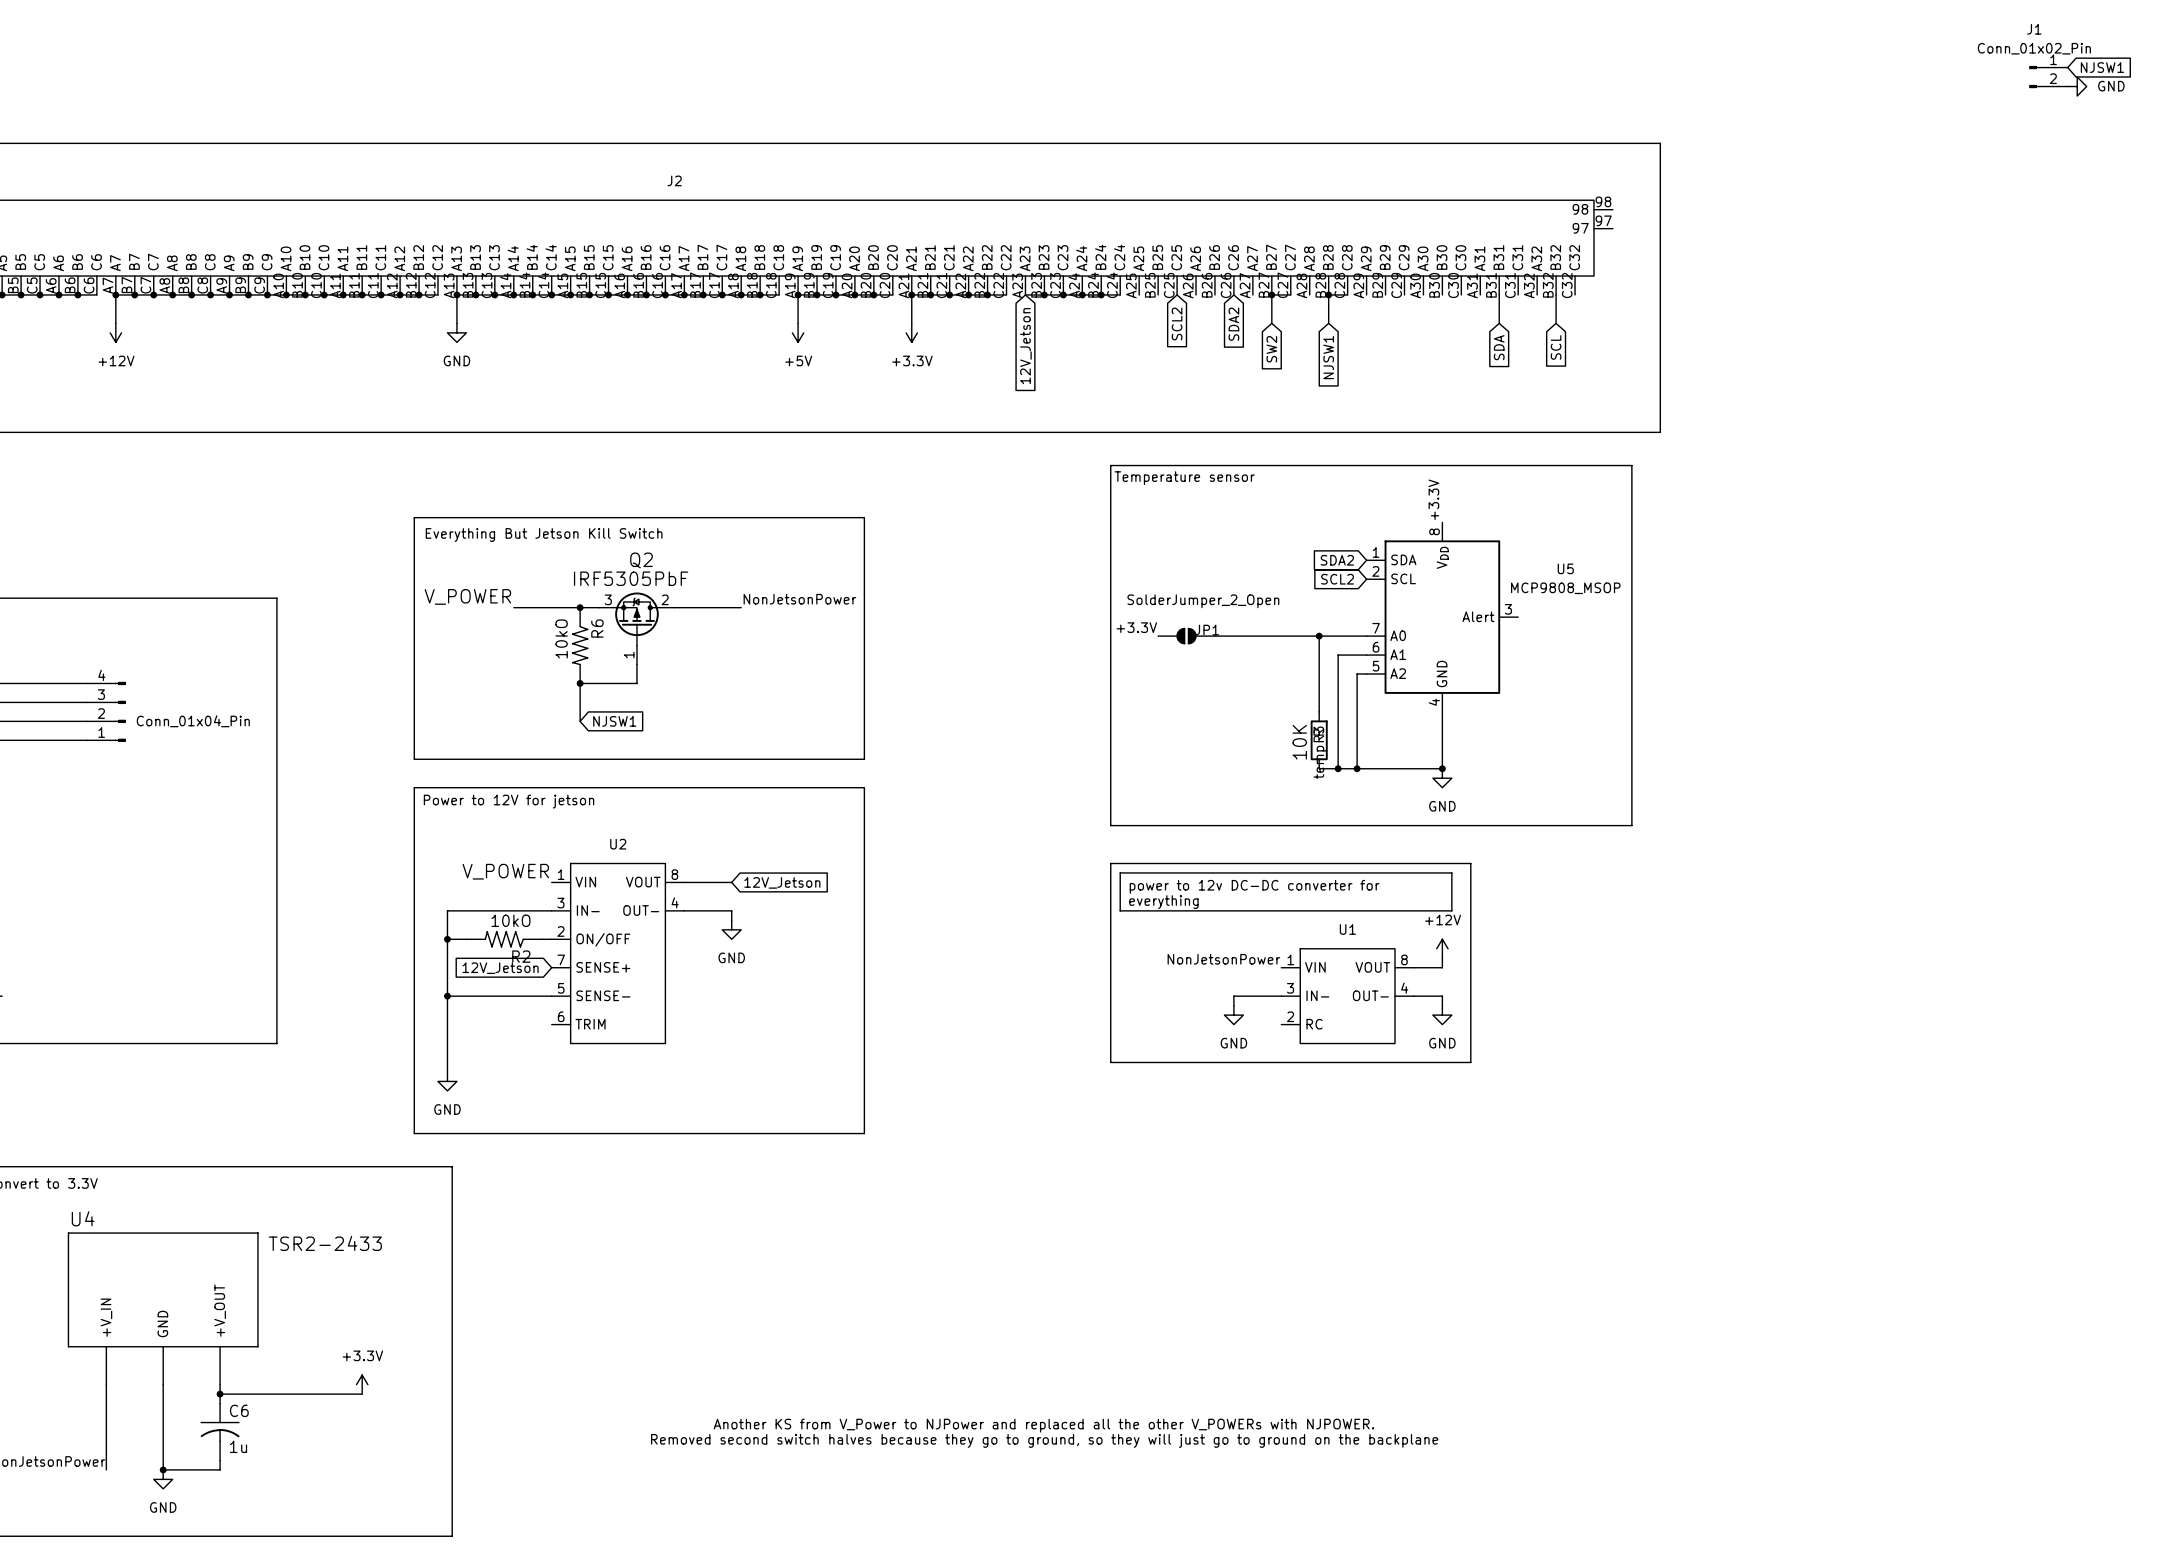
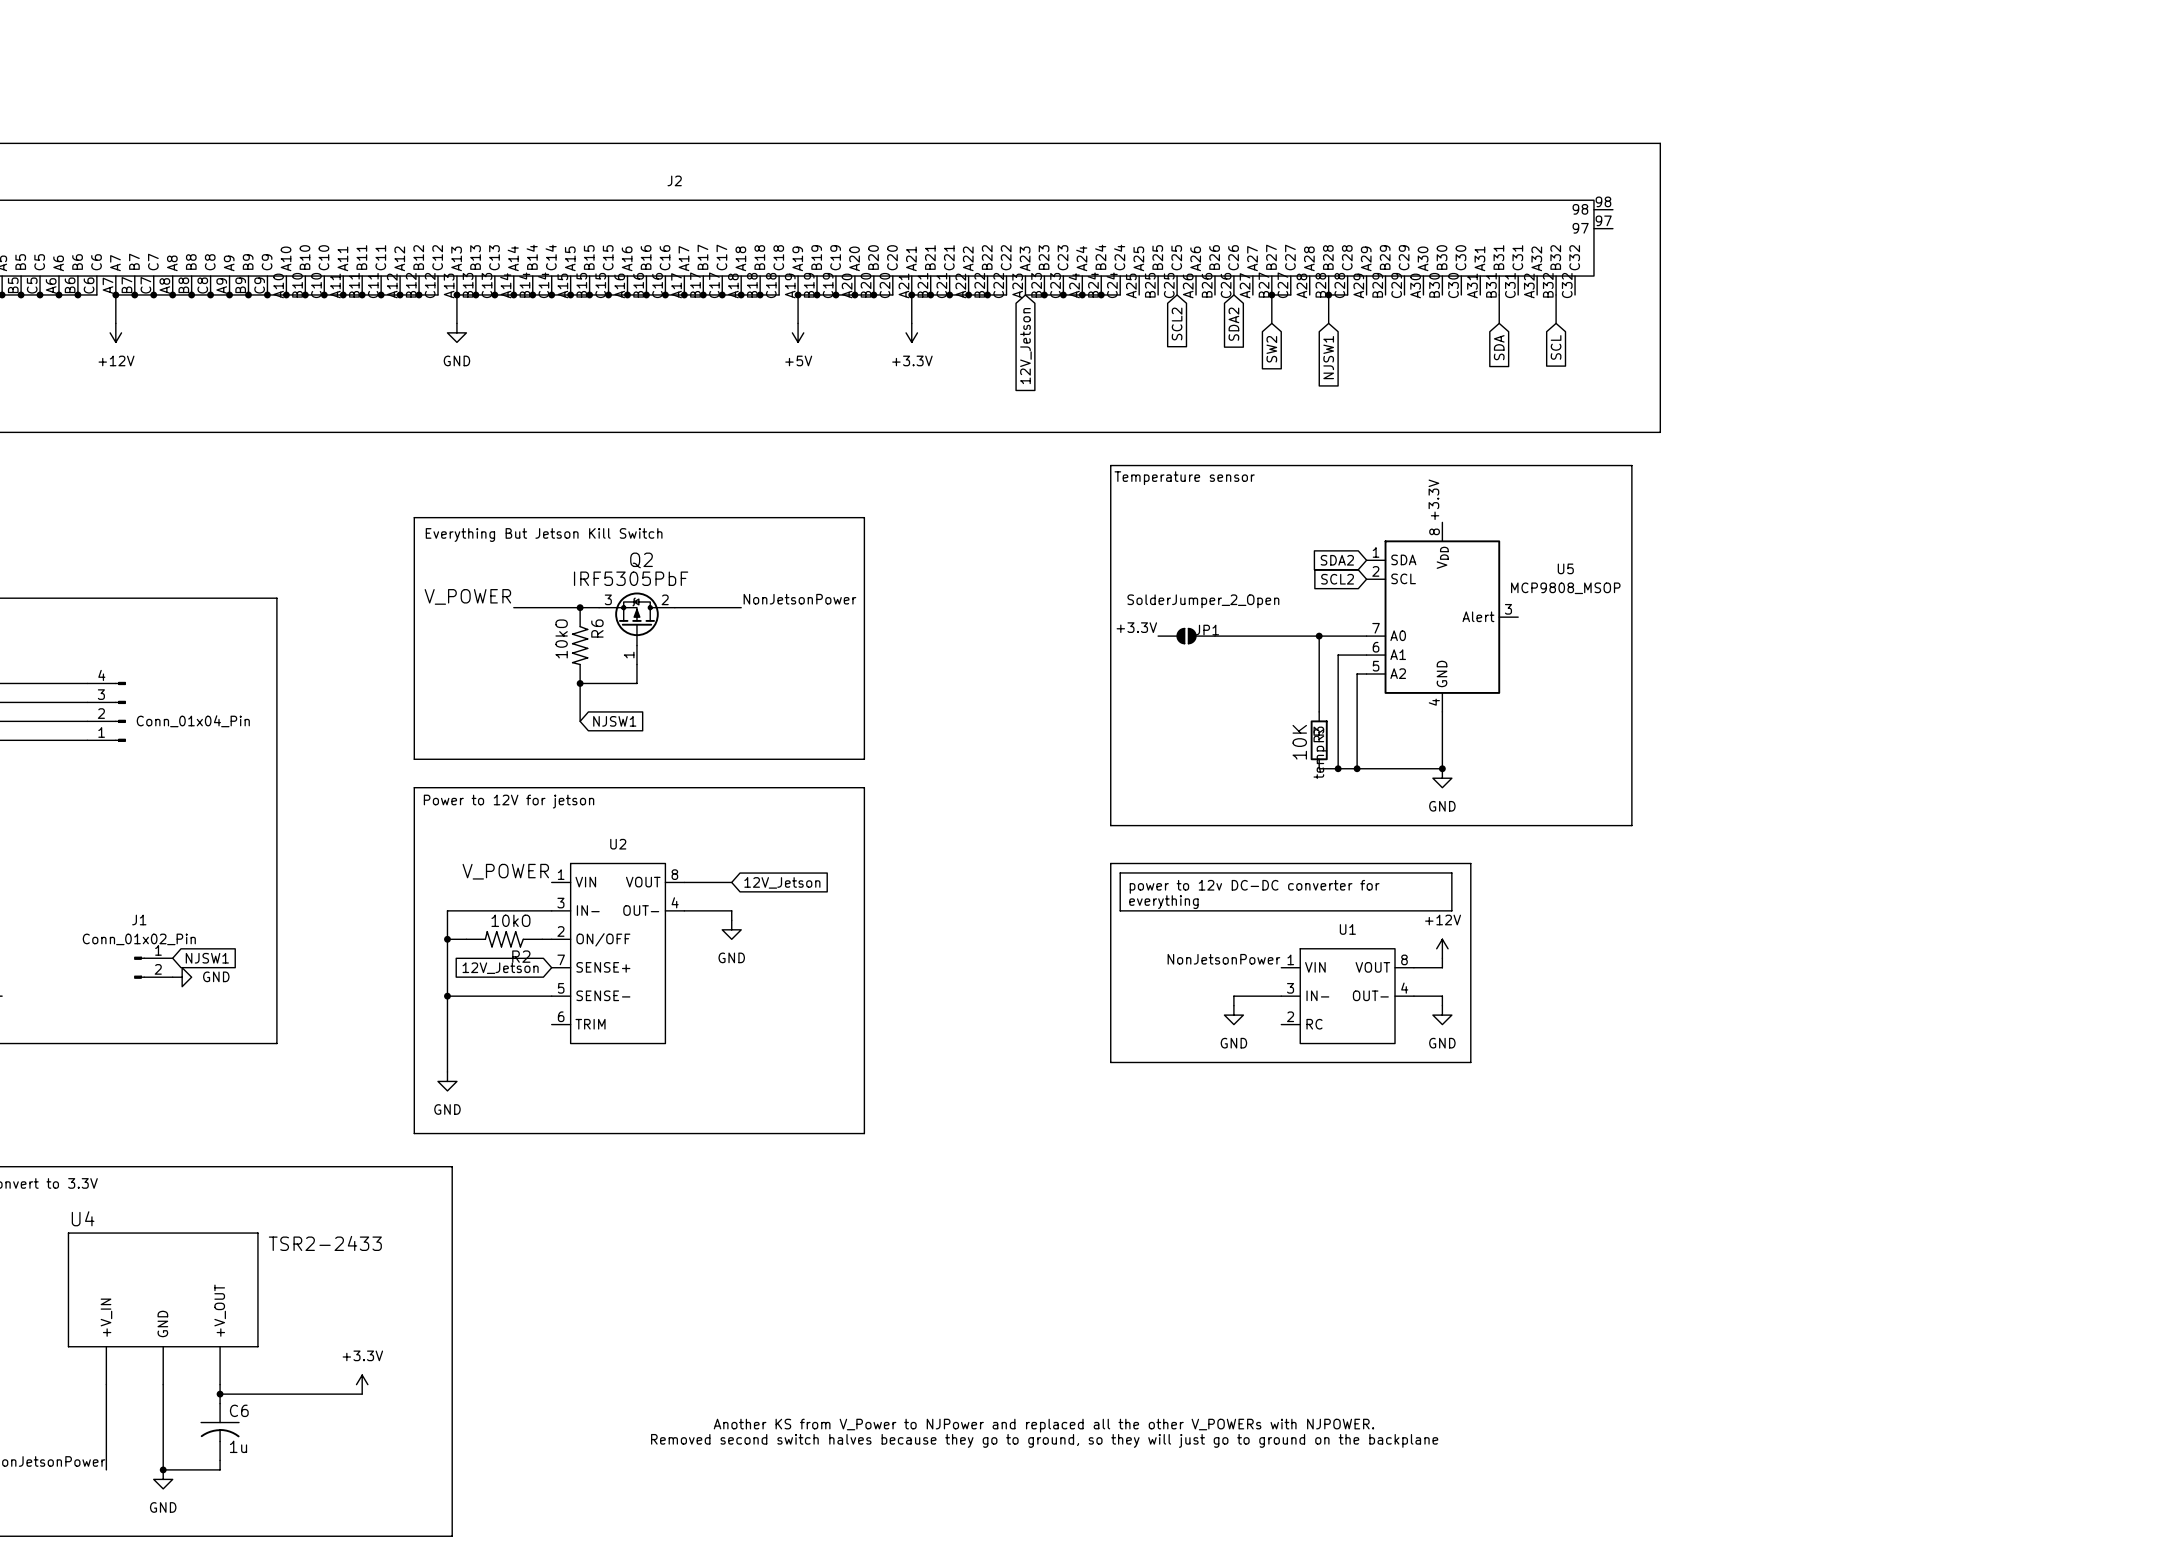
global label: NJSW1 (2102, 67) -> none
J1 position: (2048, 77) -> (153, 967)
power symbol: GND (2077, 86) -> none
global label: none -> NJSW1 (207, 958)
power symbol: none -> GND (182, 977)

